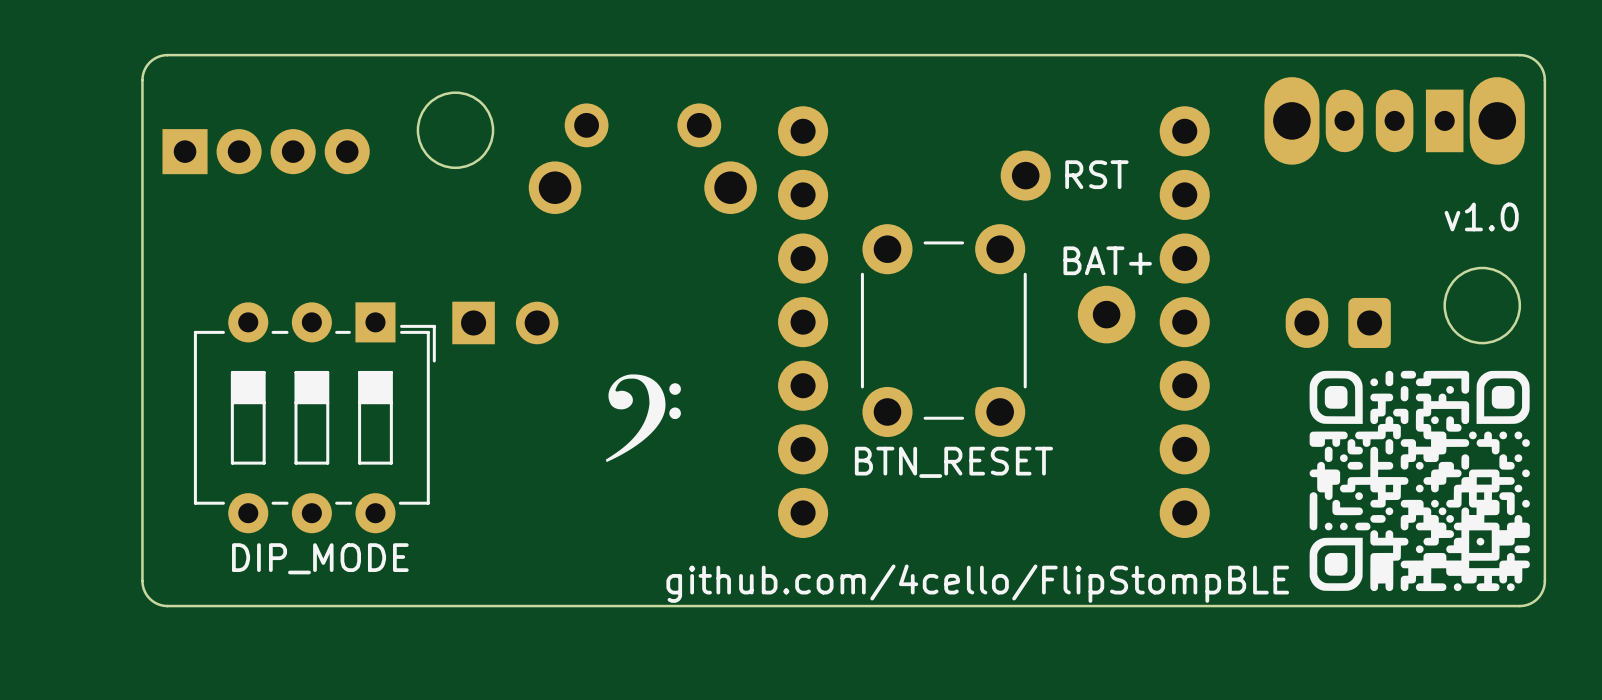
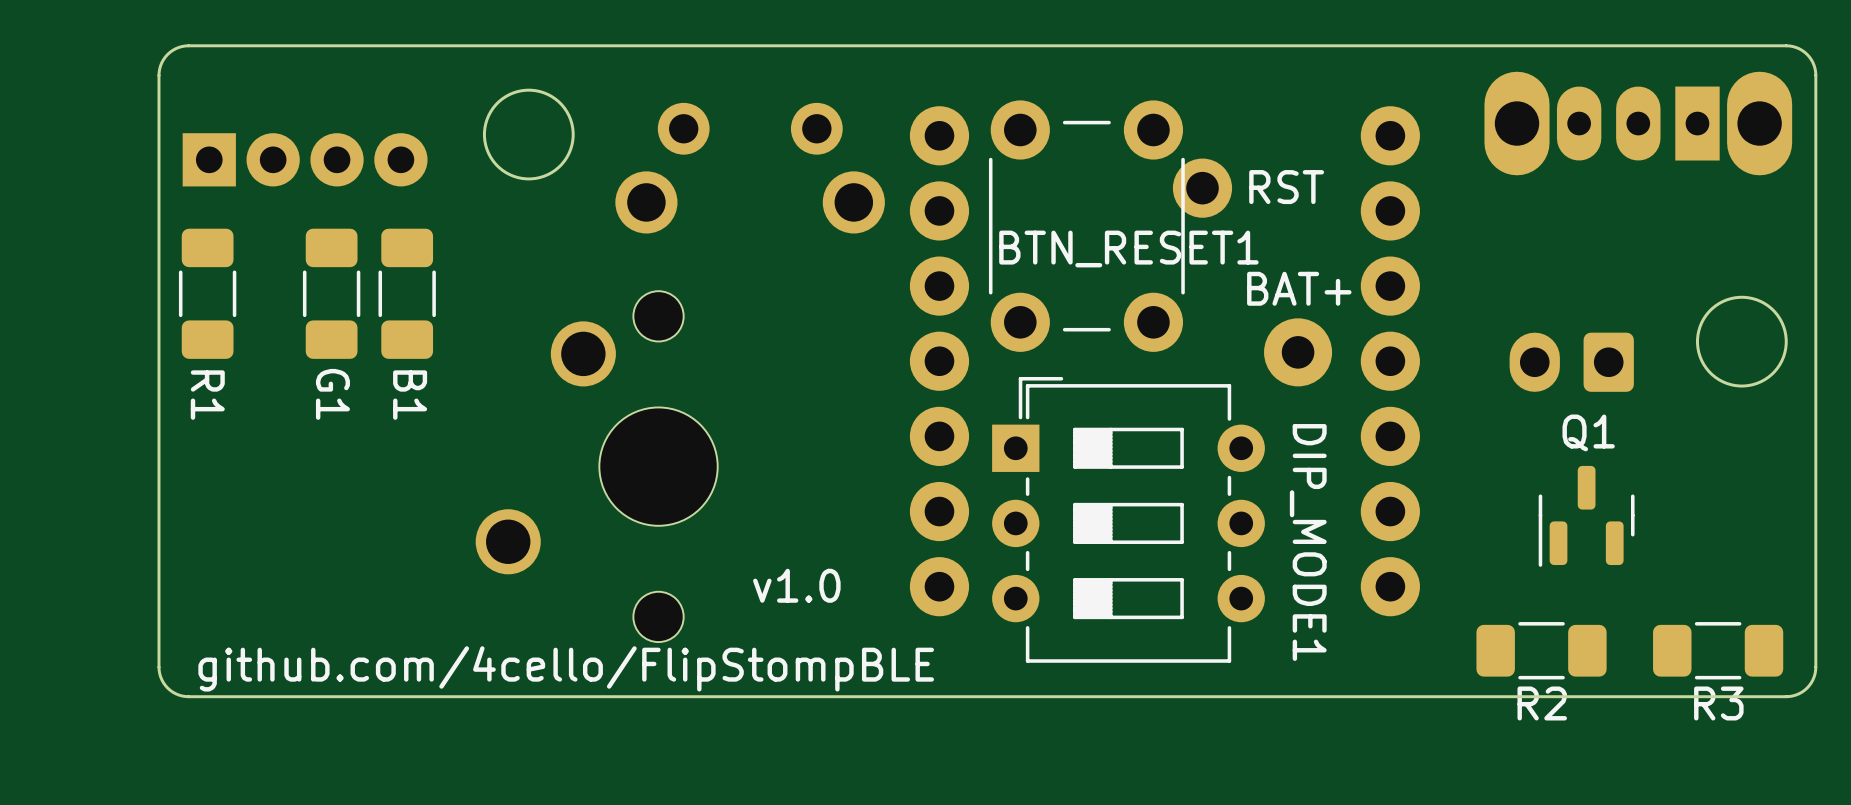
BTN_RESET1: none -> (1086, 226)
text: v1.0 (1481, 216) -> none
R1: none -> (207, 293)
G1: none -> (331, 293)
B1: none -> (407, 293)
part: (505, 322) -> none
BTN_RESET: (943, 330) -> none
drawing: [1309, 370, 1530, 592] -> none
drawing: [605, 374, 681, 463] -> none
part: none -> (596, 466)
DIP_MODE: (314, 417) -> none
Q1: none -> (1586, 516)
DIP_MODE1: none -> (1128, 519)
text: none -> v1.0 (796, 585)
R2: none -> (1541, 650)
R3: none -> (1718, 650)
text position: github.com/4cello/FlipStompBLE (977, 583) -> github.com/4cello/FlipStompBLE (566, 668)

